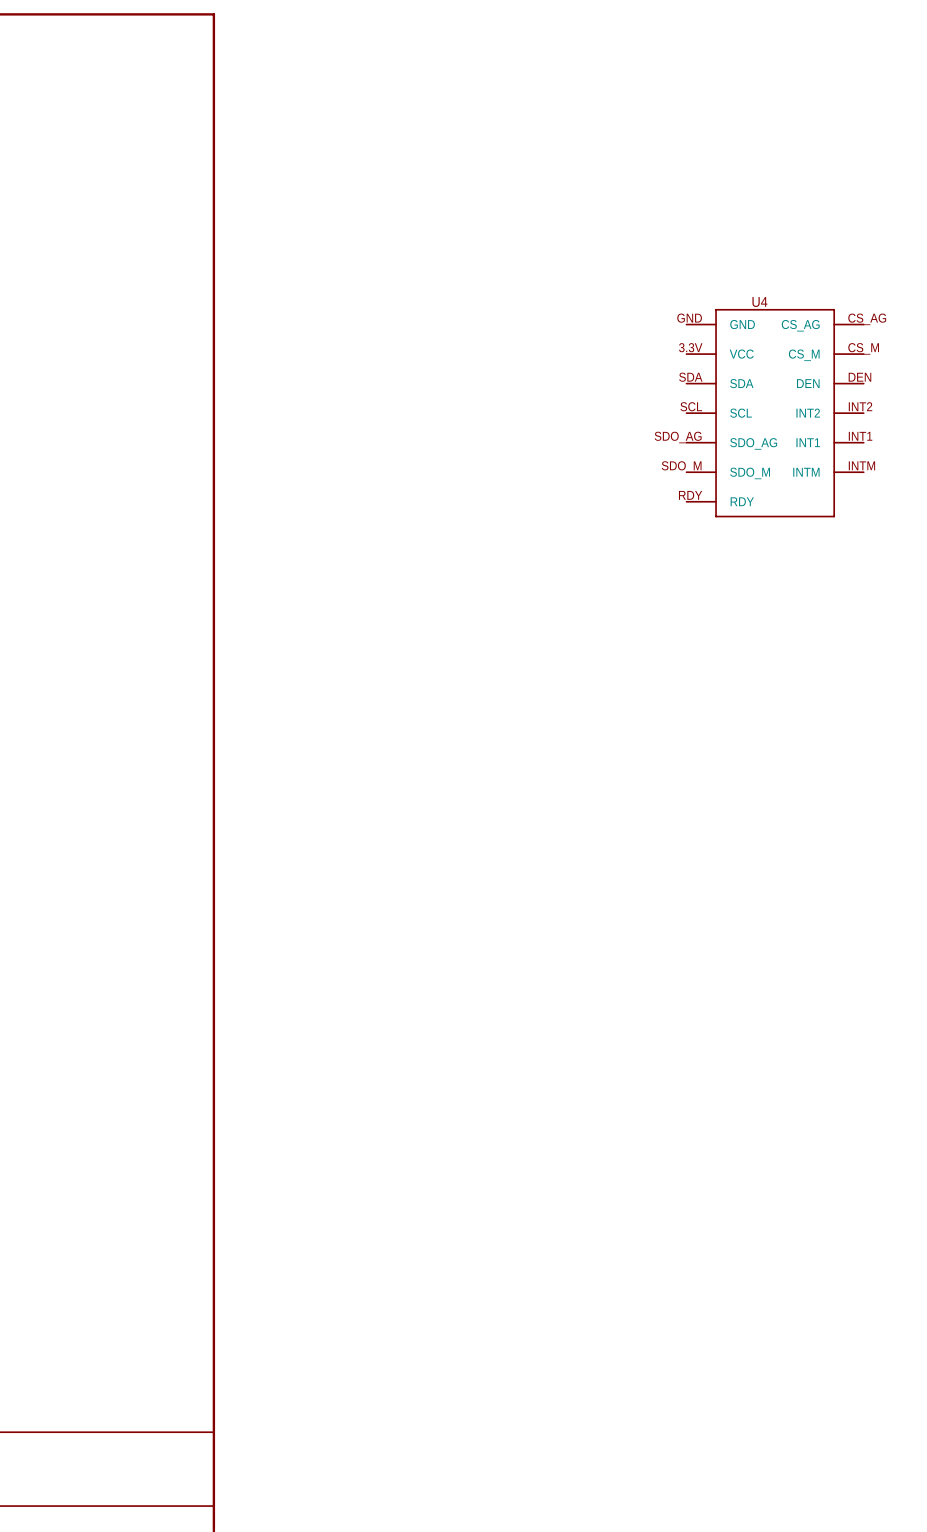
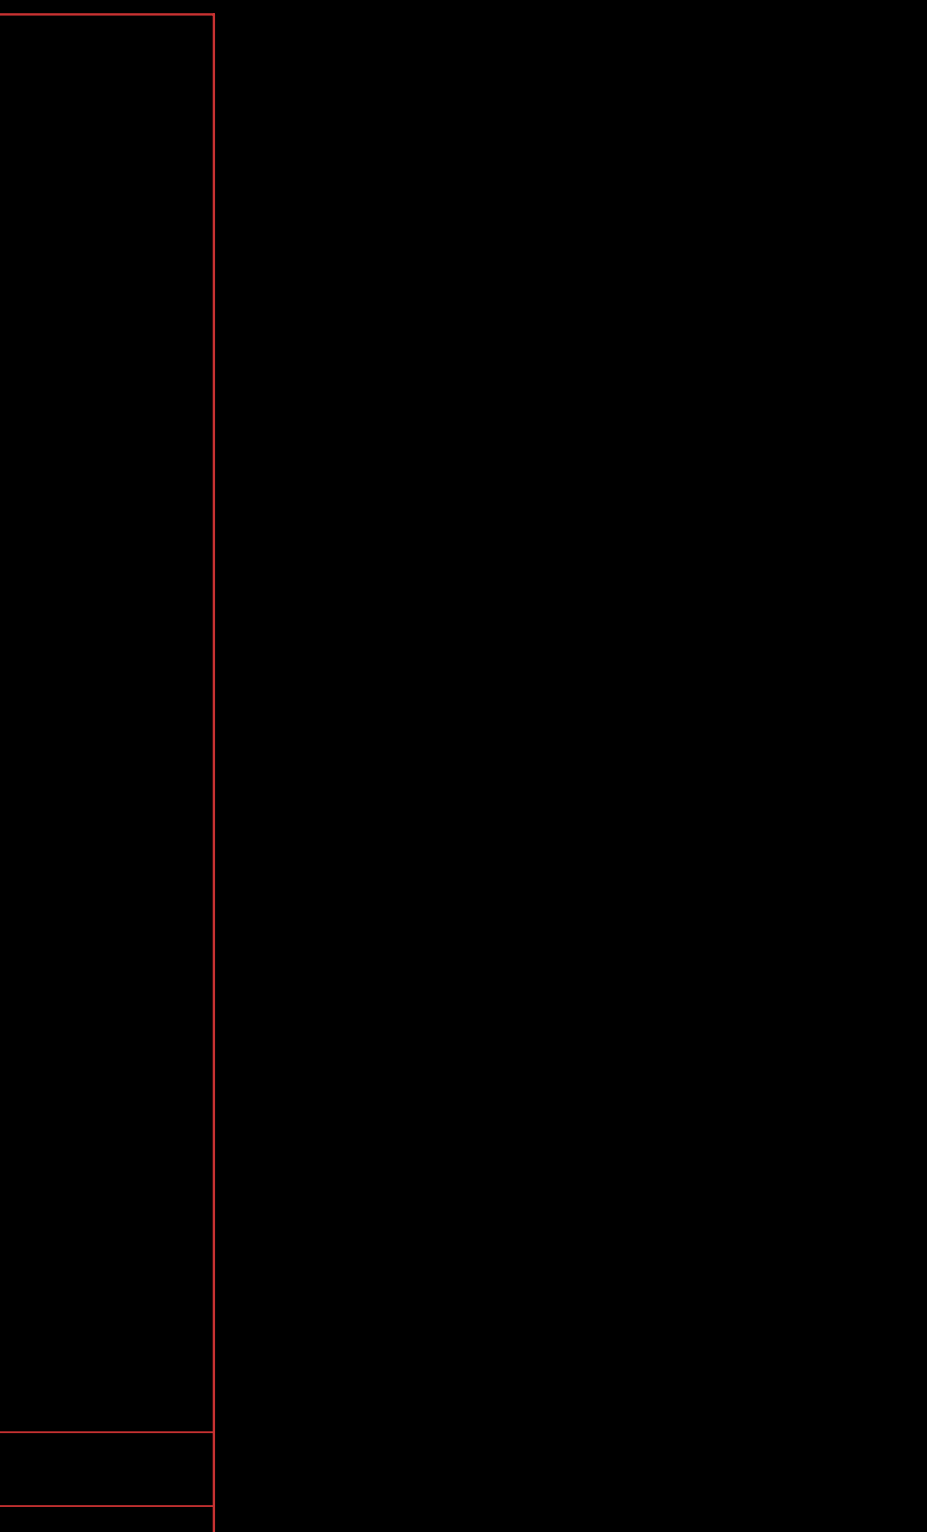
U4: (775, 413) -> none

